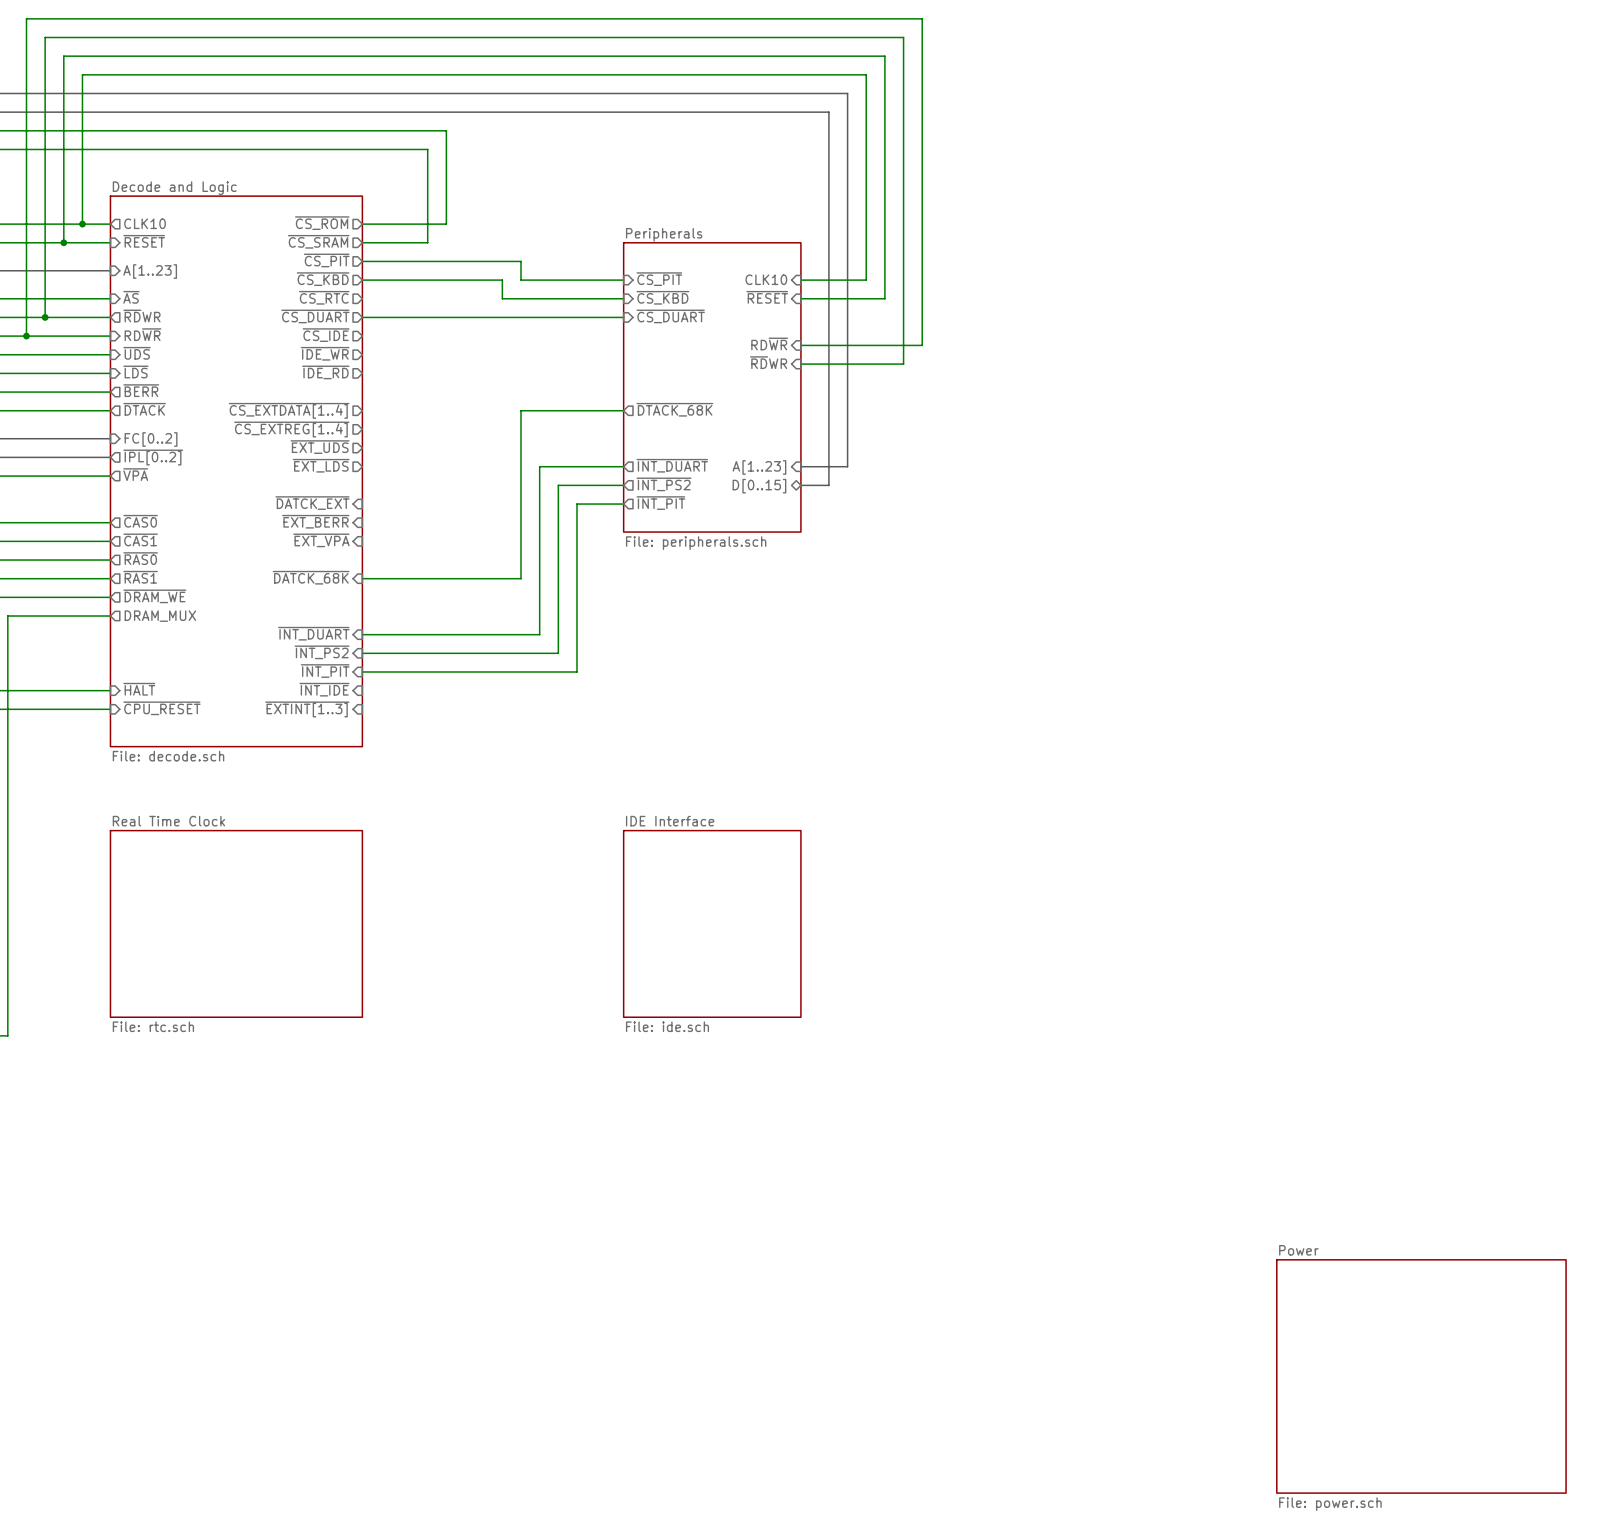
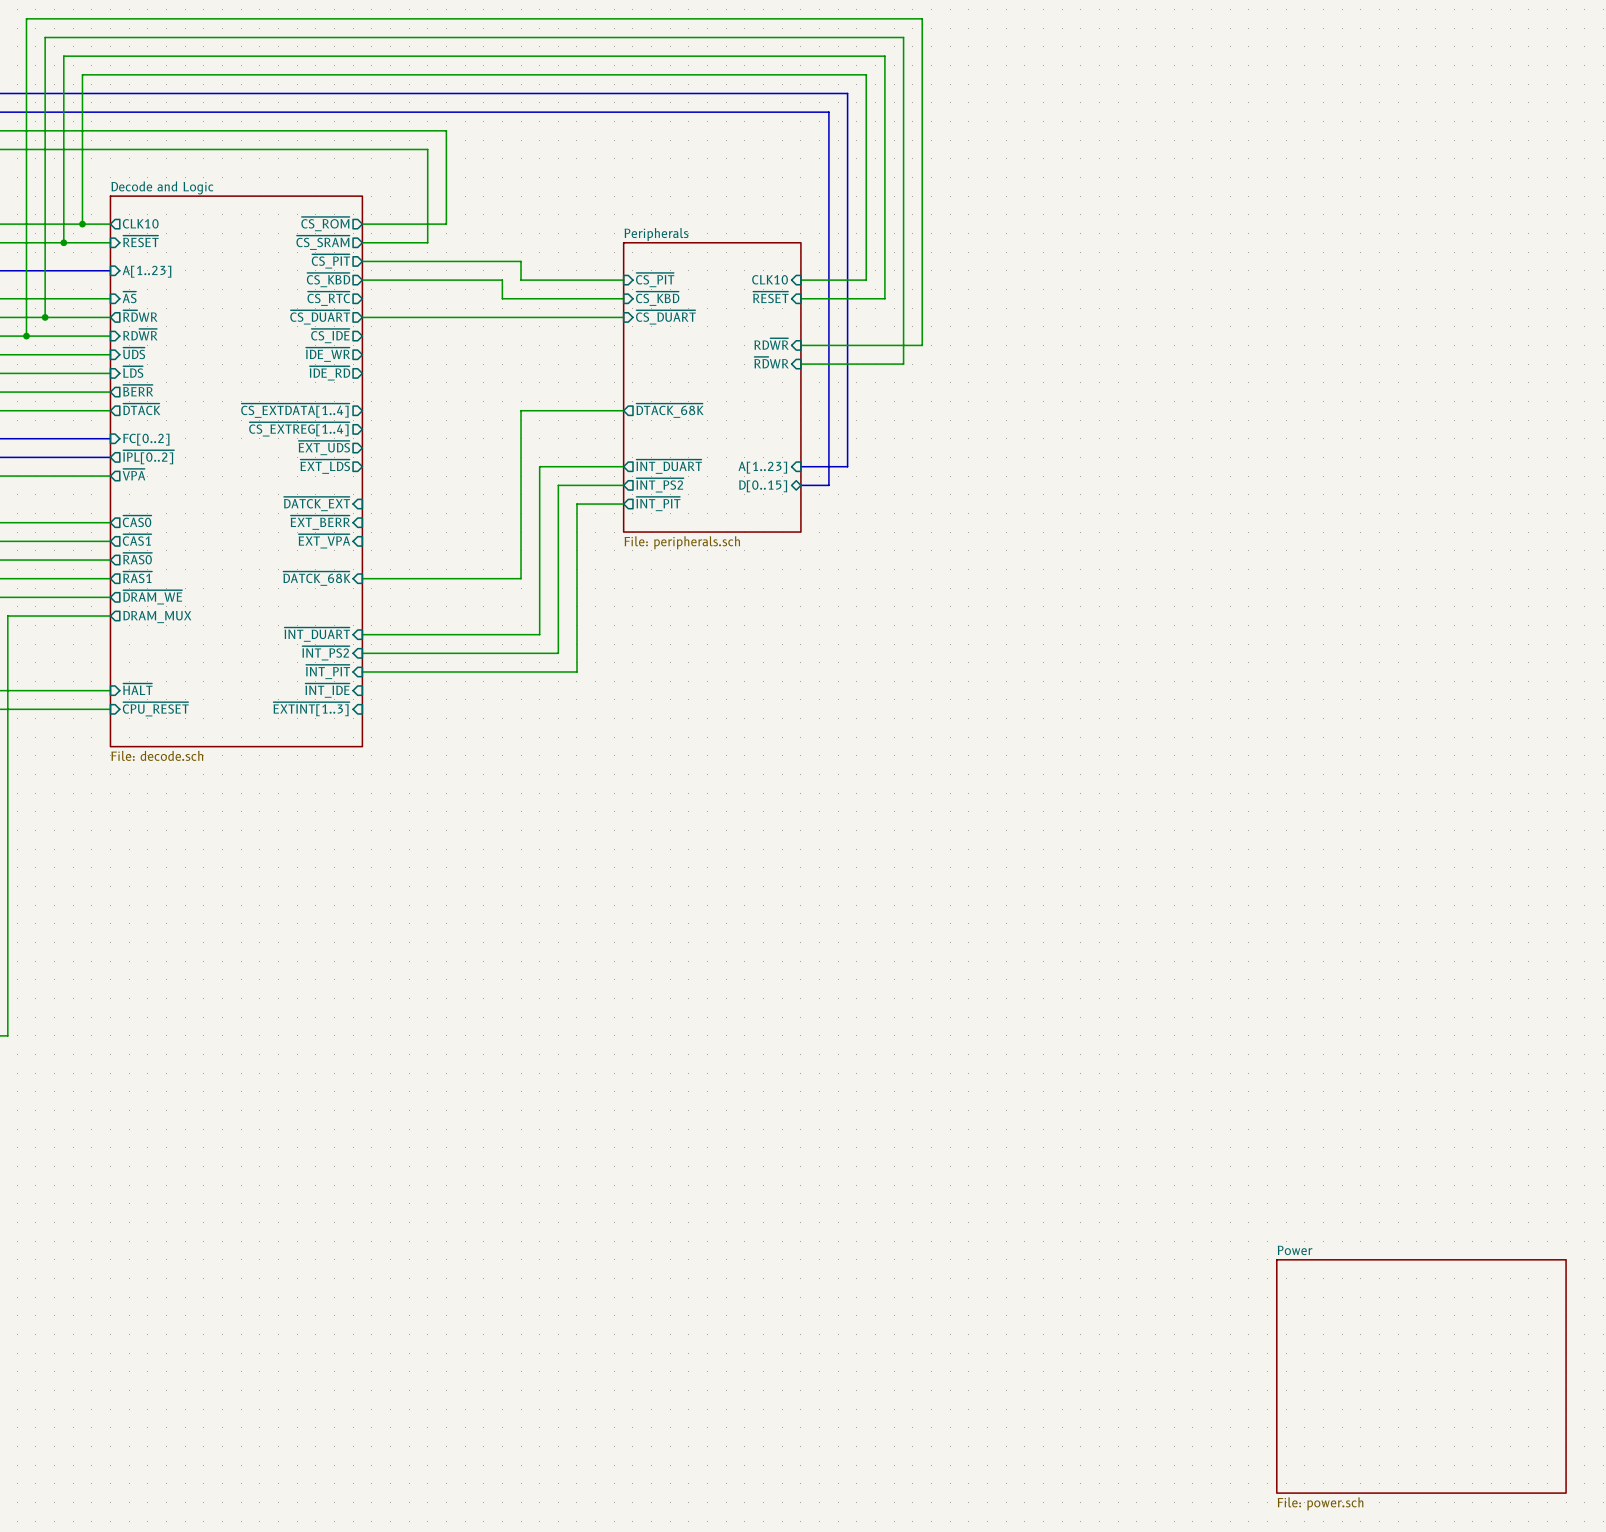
sheet Real Time Clock: File: rtc.sch (236, 923) -> none
sheet IDE Interface: File: ide.sch (712, 923) -> none

